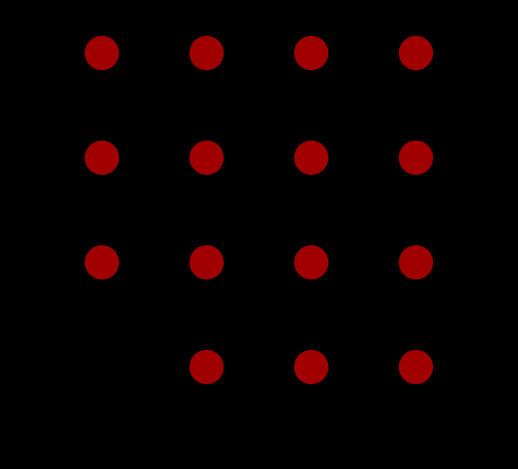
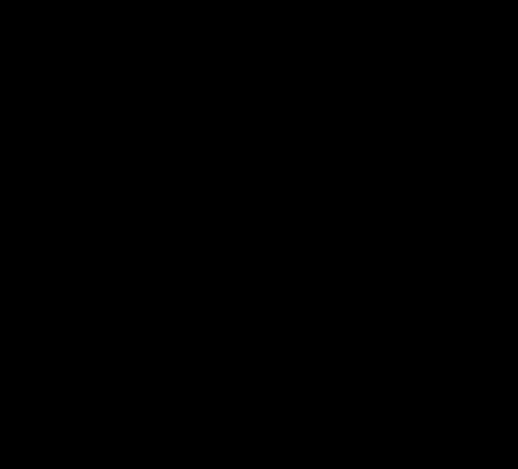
part: (101, 53) -> none
part: (206, 53) -> none
part: (311, 53) -> none
part: (415, 53) -> none
part: (101, 157) -> none
part: (206, 157) -> none
part: (311, 157) -> none
part: (415, 157) -> none
part: (101, 262) -> none
part: (206, 262) -> none
part: (311, 262) -> none
part: (415, 262) -> none
part: (206, 367) -> none
part: (311, 367) -> none
part: (415, 367) -> none

